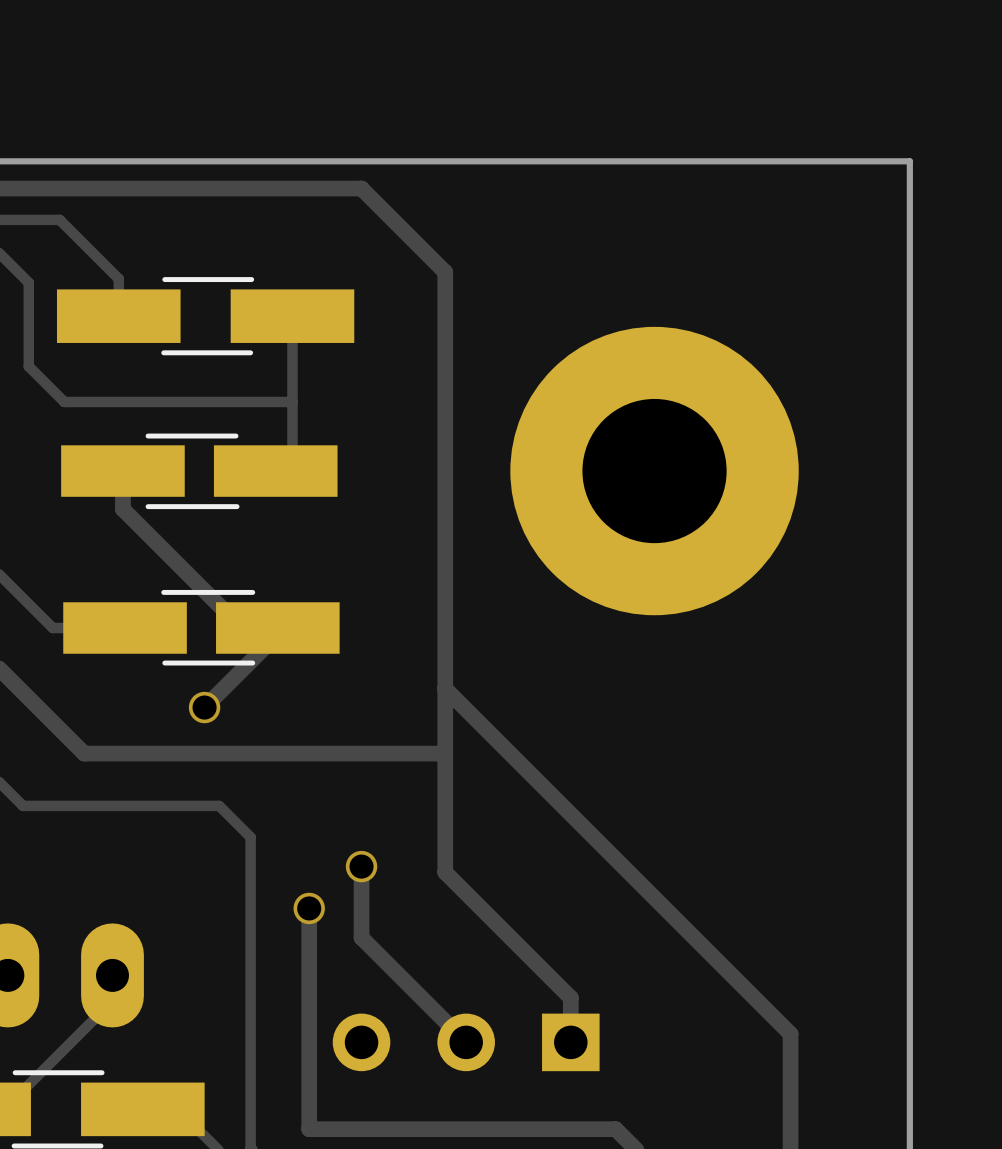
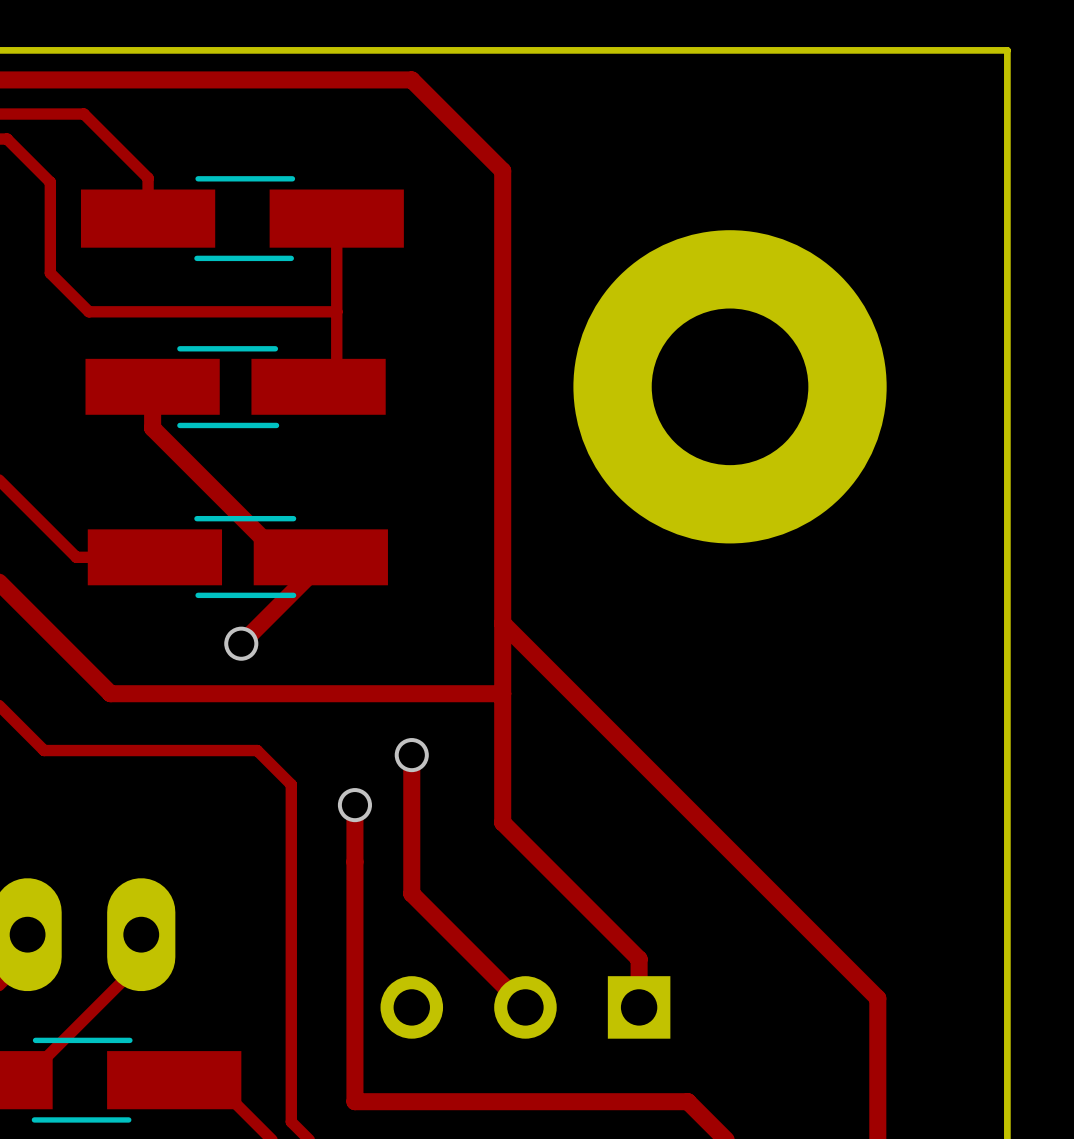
track: none -> (411, 755) (411, 816)
via: none -> (411, 755)
track: none -> (354, 805) (354, 861)
via: none -> (354, 805)
via: (361, 866) -> none
via: (309, 908) -> none

